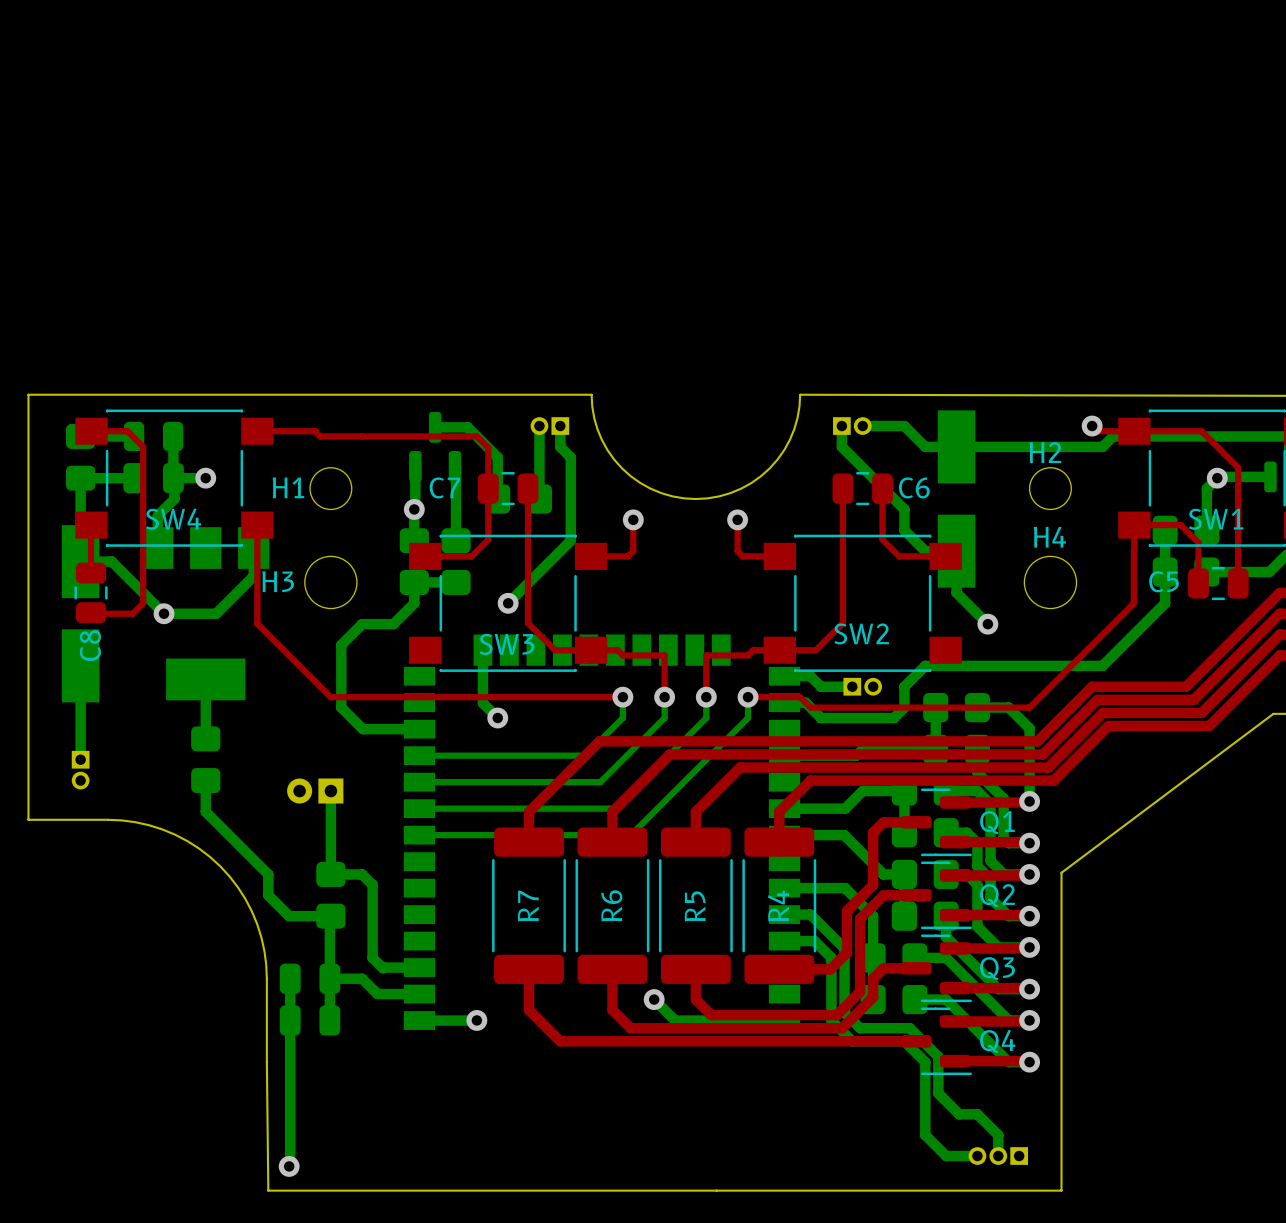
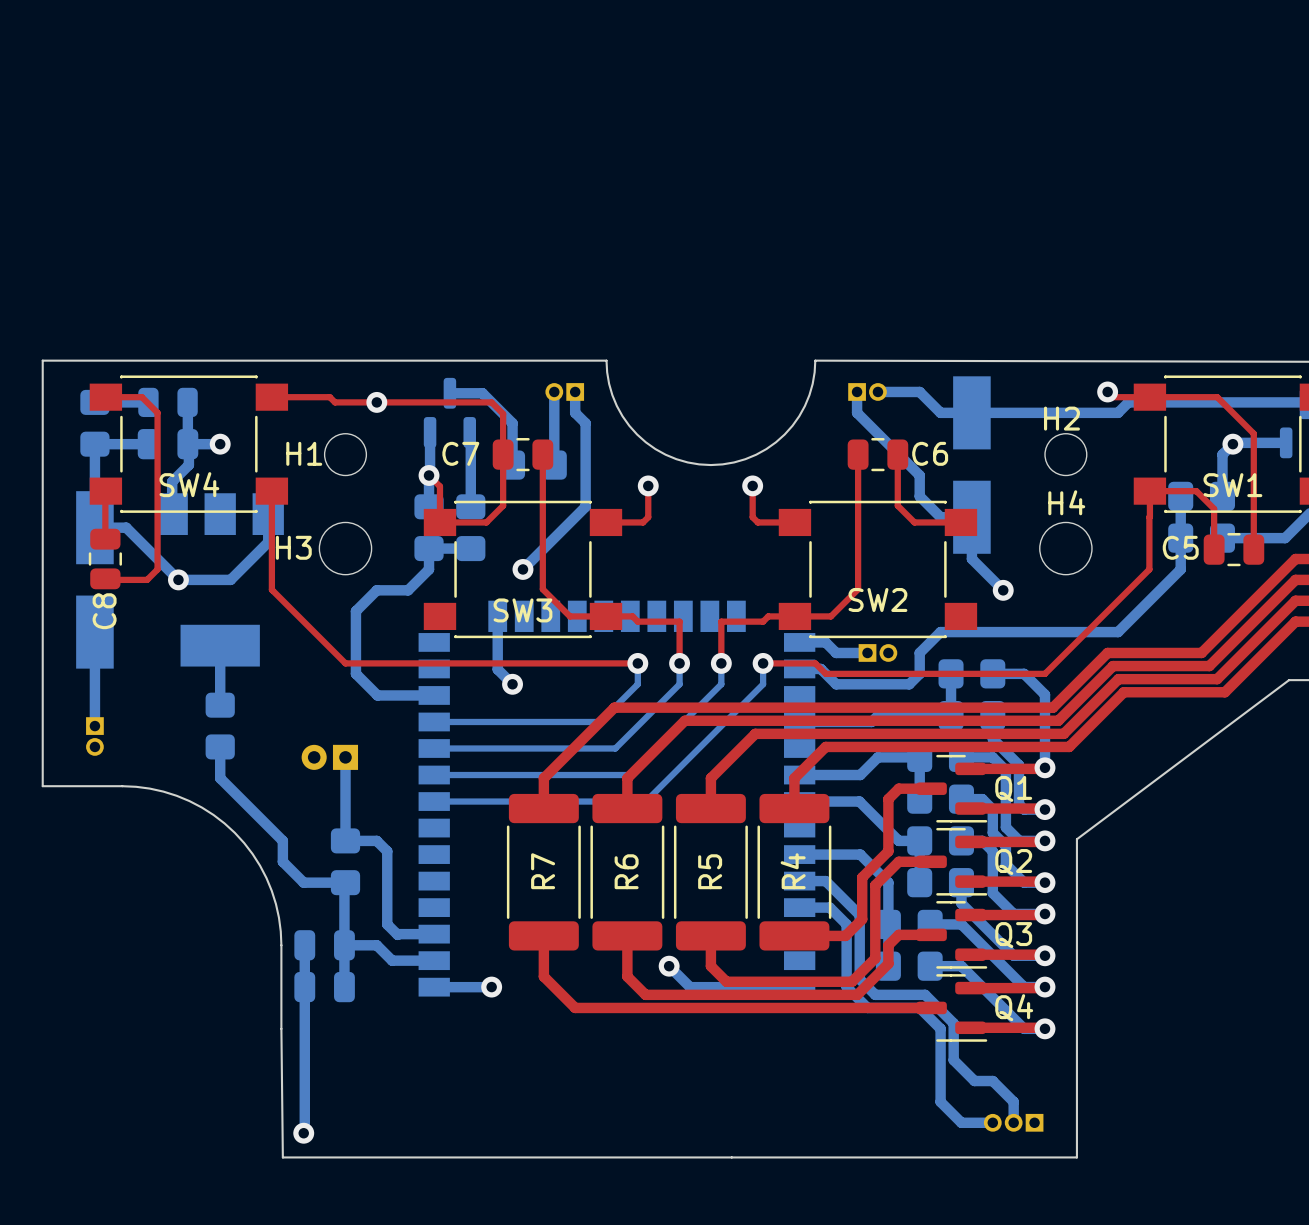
via: none -> (376, 402)
top track: none -> (429, 475) (439, 486) (439, 522)

